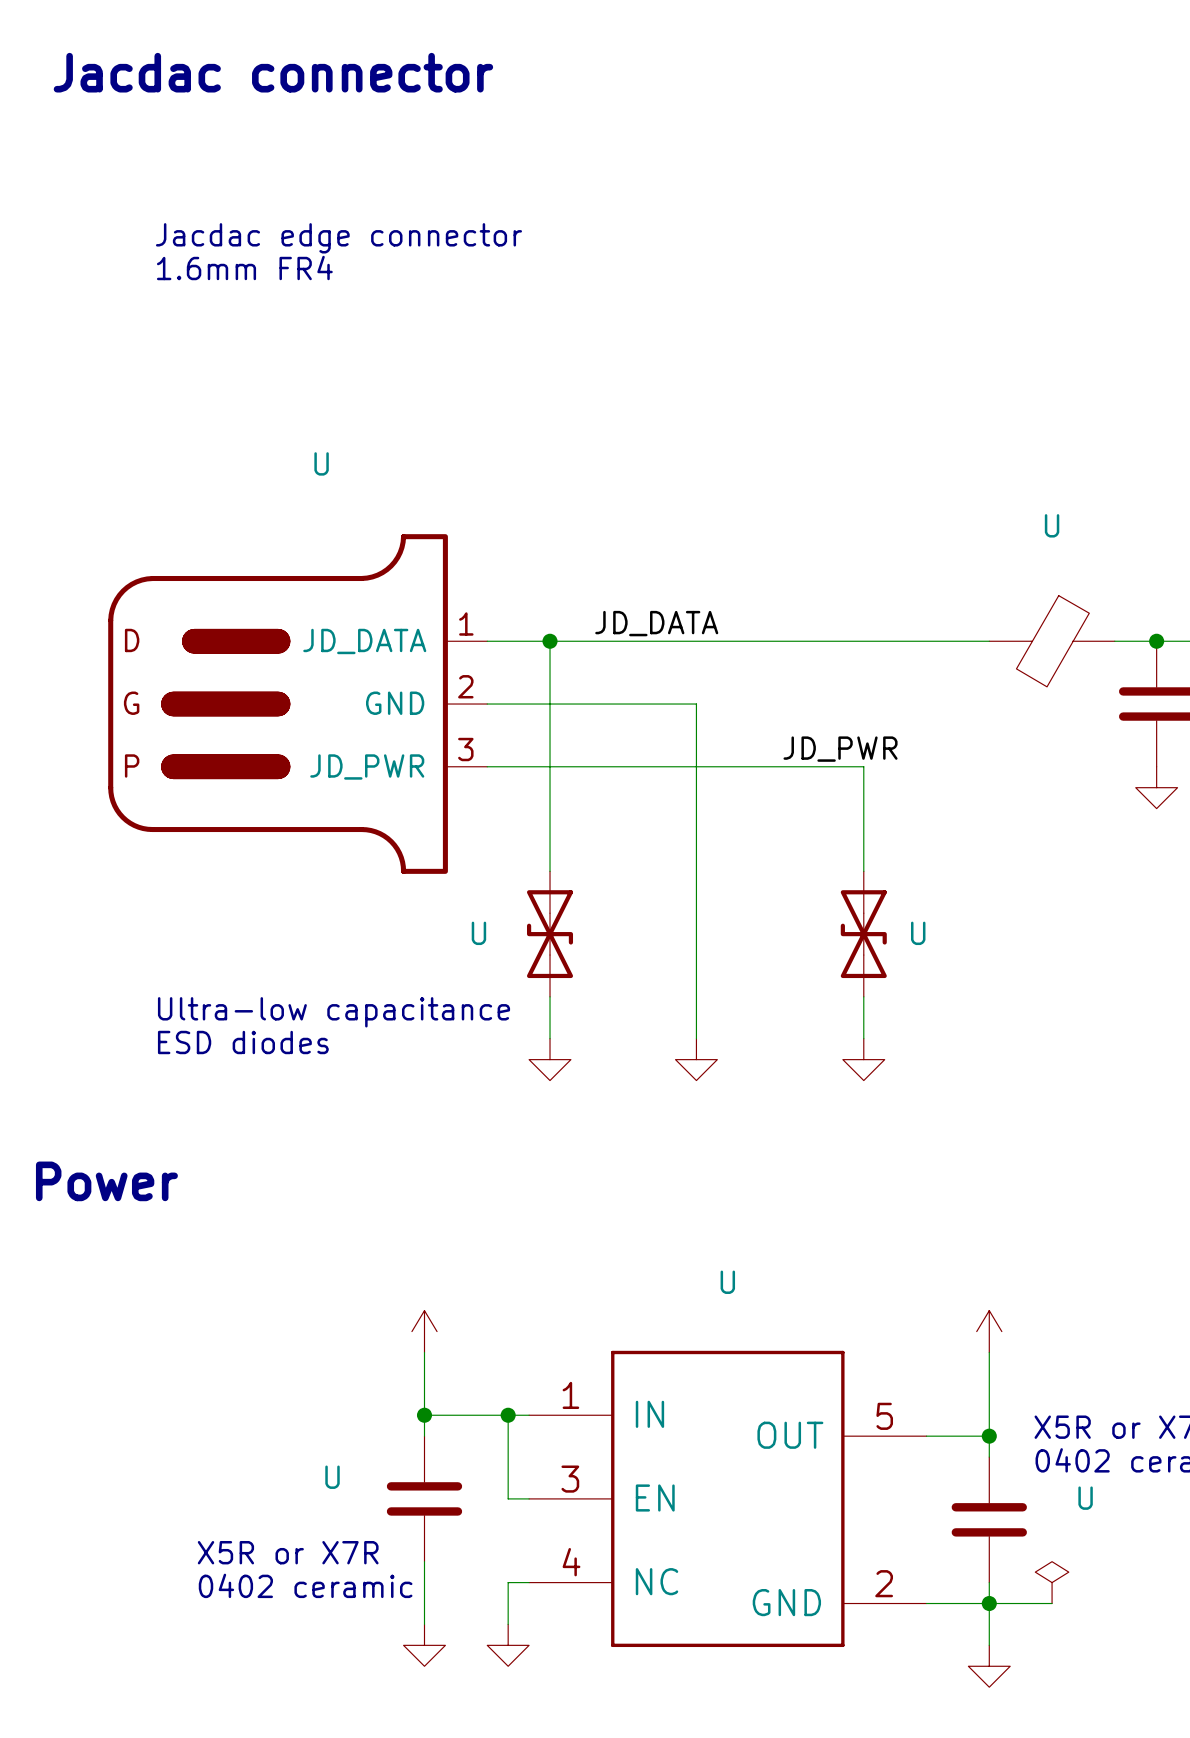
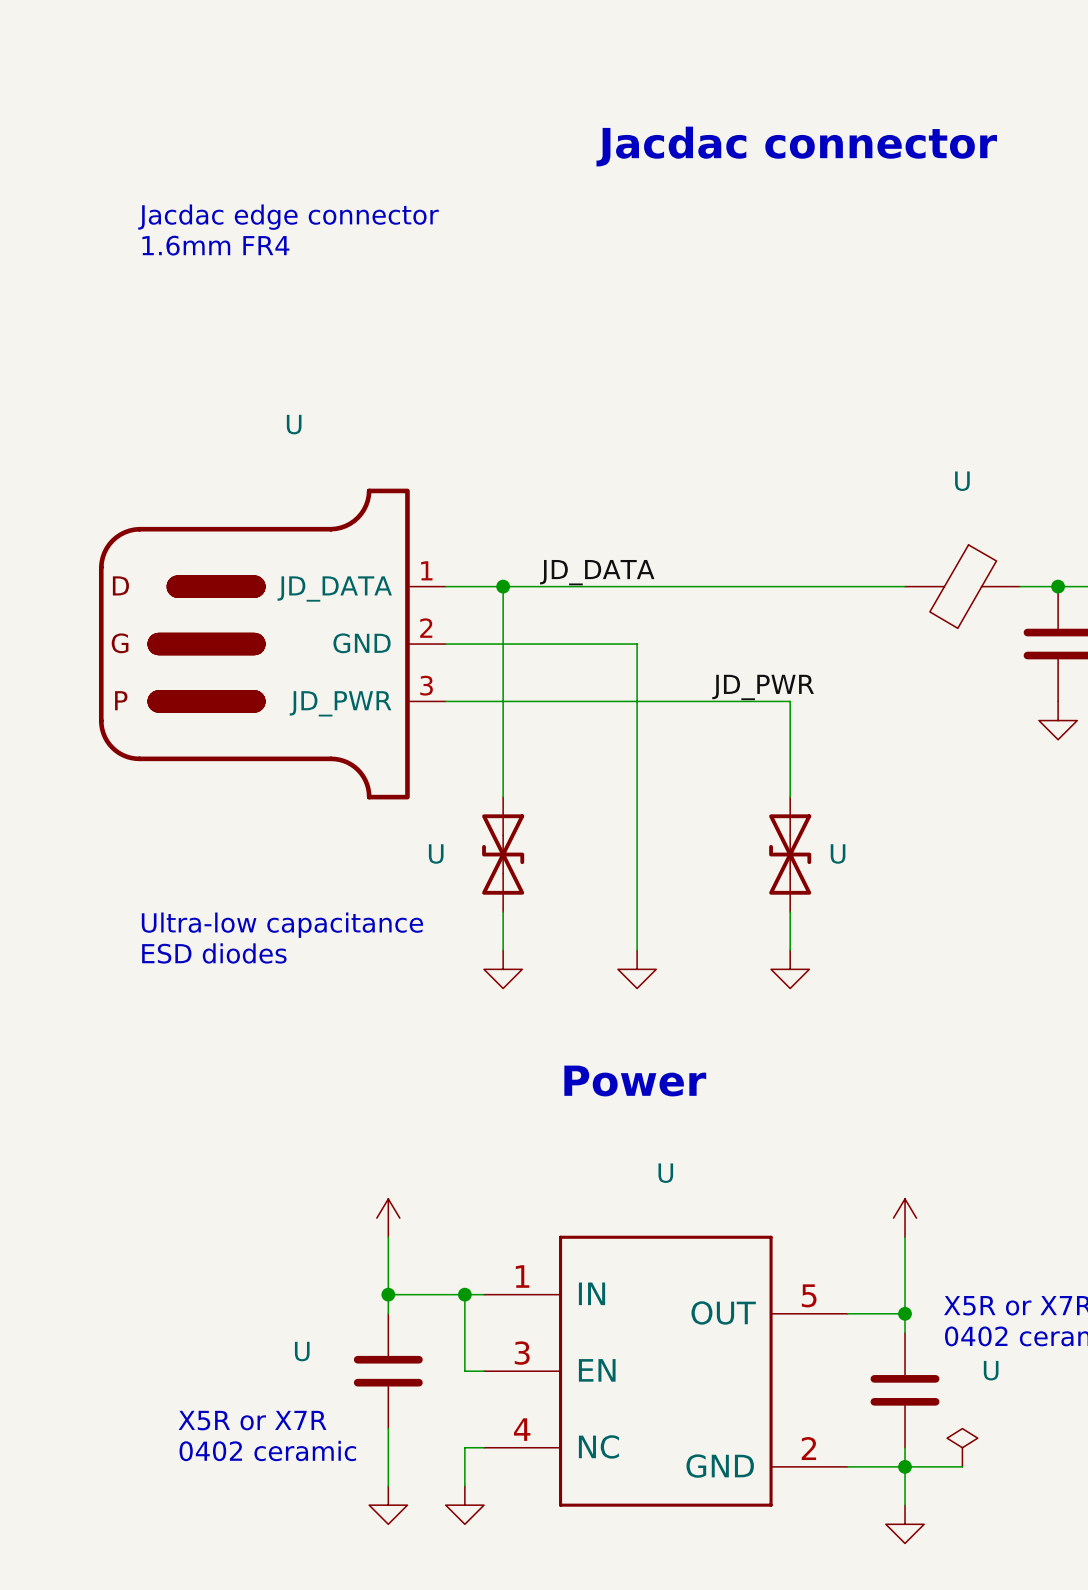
text: Jacdac connector (273, 72) -> none
text: none -> Jacdac connector (796, 146)
text: Power (106, 1181) -> none
text: none -> Power (635, 1081)

